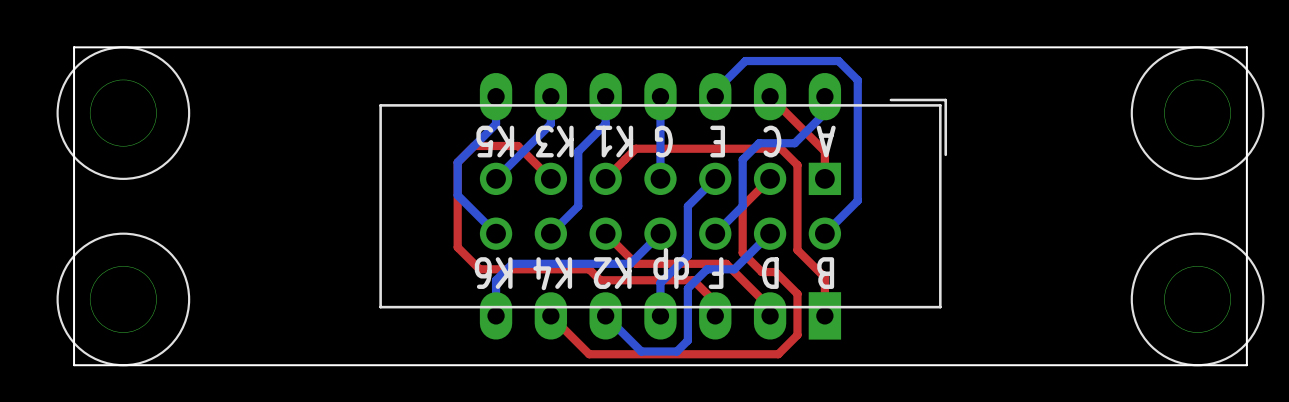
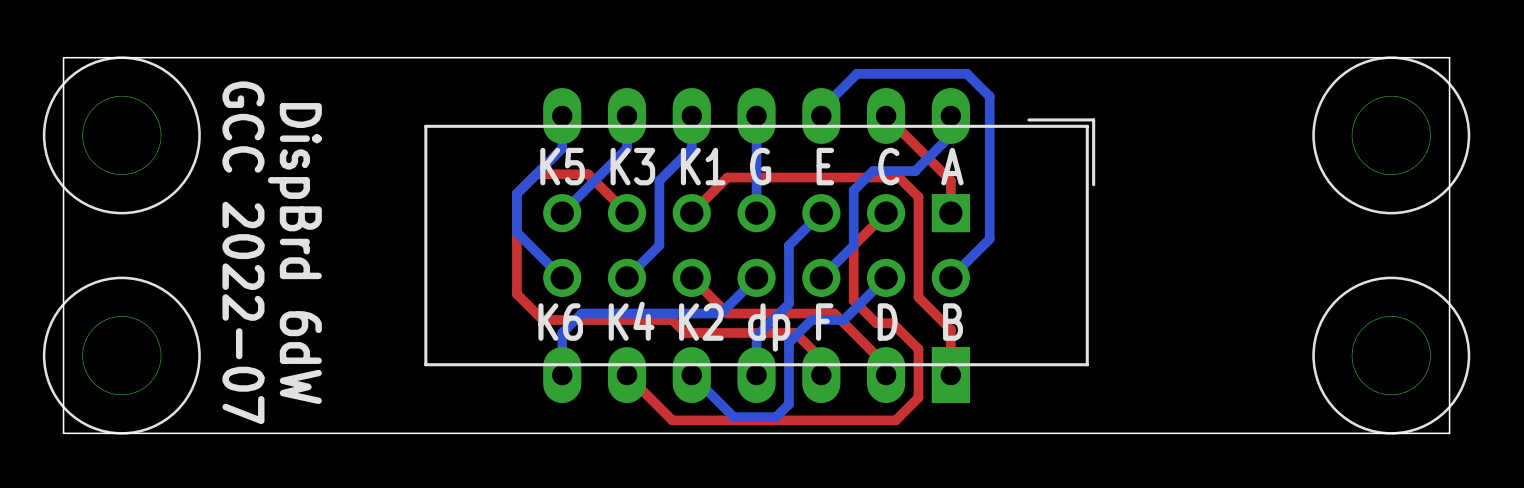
text: A C E G K1 K3 K5 (656, 141) -> K5 K3 K1 G E C A (751, 166)
text: none -> GCC 2022-07 (243, 252)
text: none -> DispBrd 6dW (294, 253)
text: B D F dp K2 K4 K6 (654, 269) -> K6 K4 K2 dp F D B (750, 326)

